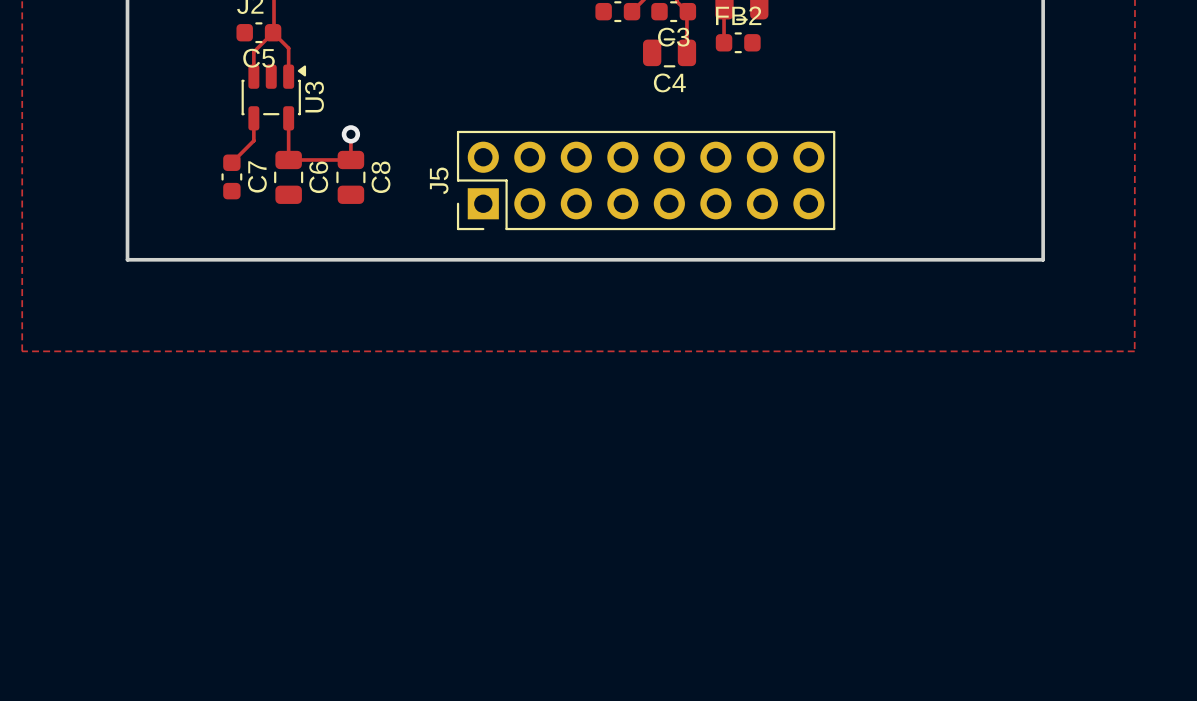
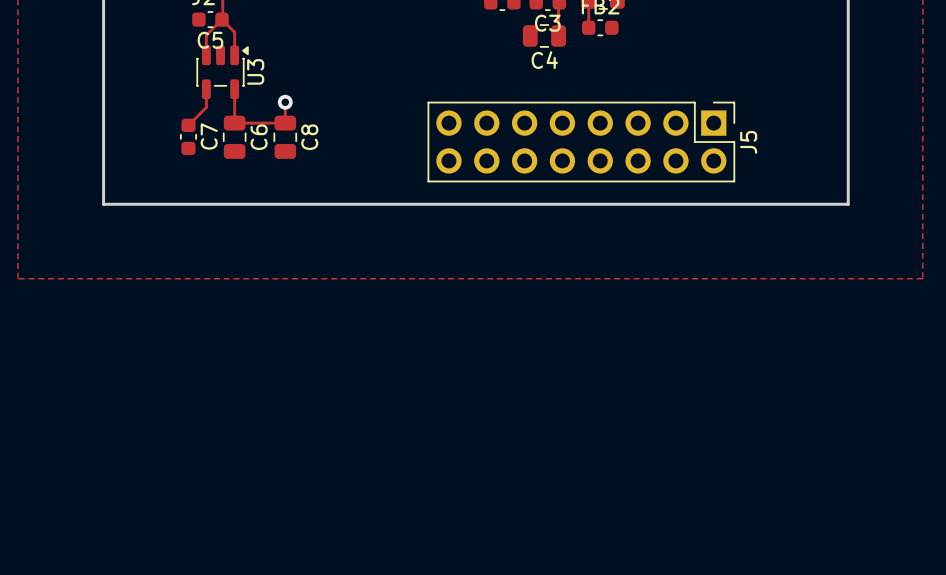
J5 rotation: 0° (646, 180) -> 180° (581, 142)

